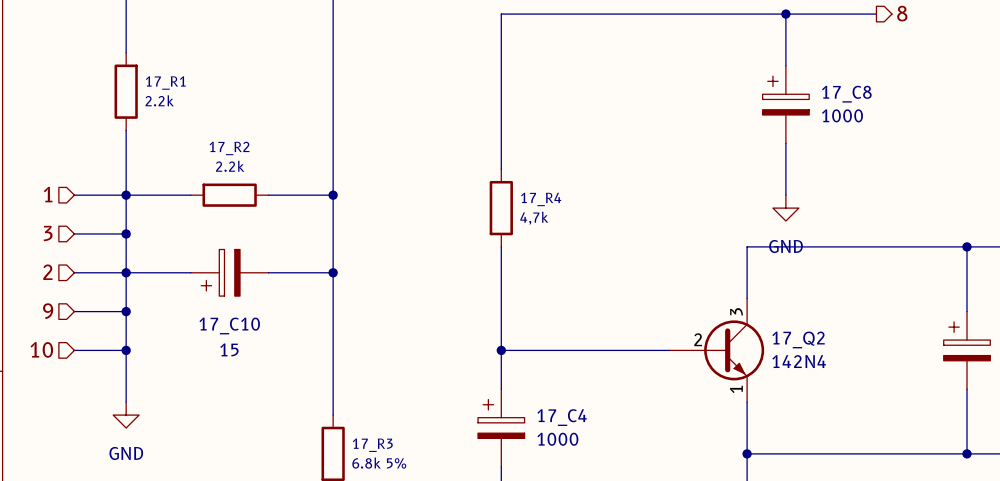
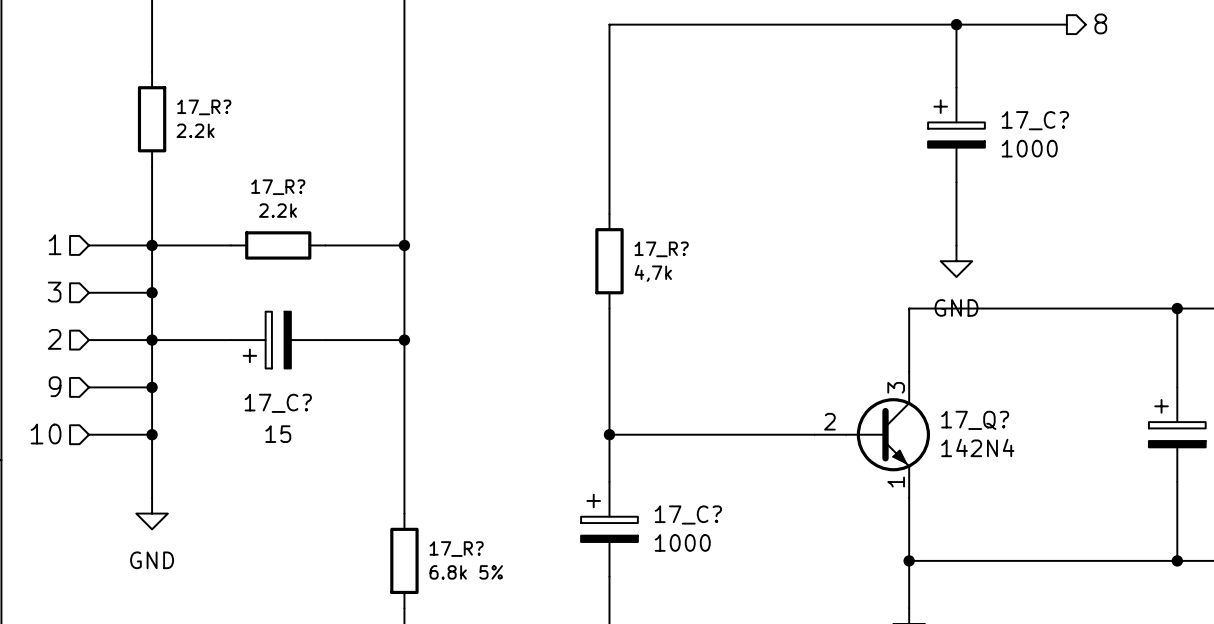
17_R1 name: 17_R1 (165, 83) -> 17_R? (204, 107)
17_C8 name: 17_C8 (846, 94) -> 17_C? (1035, 120)
17_R2 name: 17_R2 (229, 148) -> 17_R? (278, 187)
17_R4 name: 17_R4 (541, 199) -> 17_R? (661, 249)
17_C10 name: 17_C10 (229, 325) -> 17_C? (278, 403)
17_Q2: 142N4 (716, 350) -> none
17_Q?: none -> 142N4 (872, 434)
17_C4 name: 17_C4 (562, 417) -> 17_C? (688, 515)
17_R3 name: 17_R3 (372, 445) -> 17_R? (456, 549)

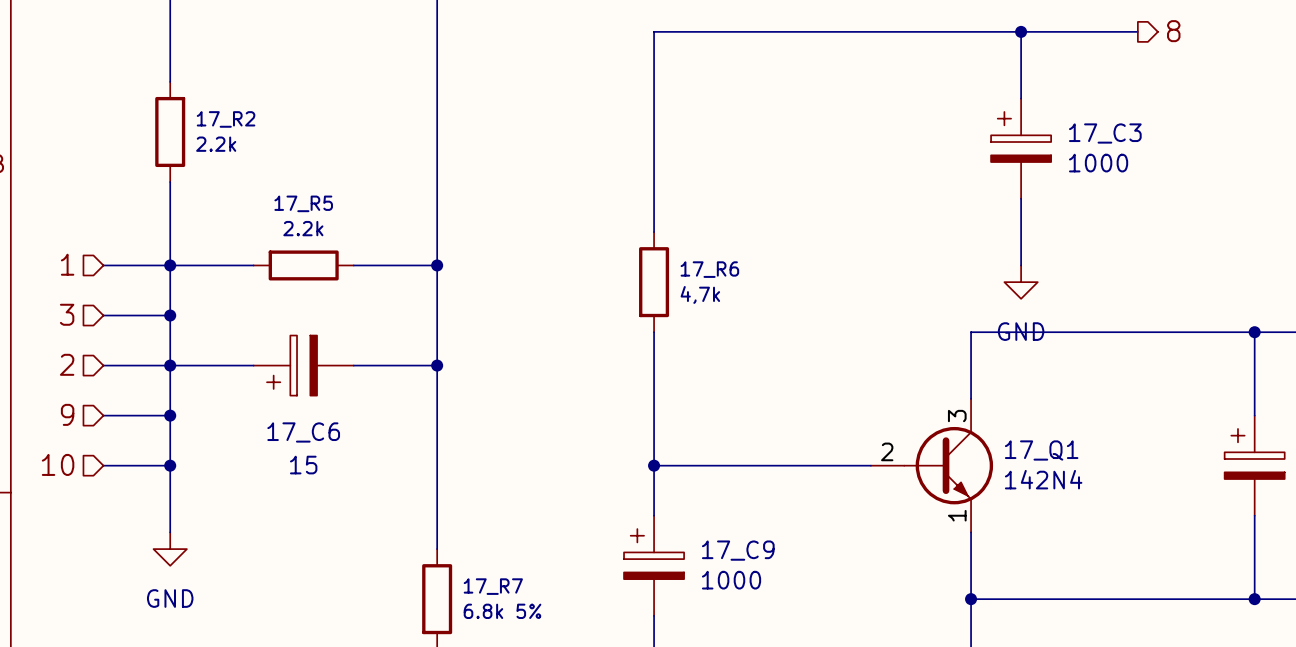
17_R? name: 17_R? (204, 107) -> 17_R2 (226, 119)
17_C? name: 17_C? (1035, 120) -> 17_C3 (1105, 133)
17_R? name: 17_R? (278, 187) -> 17_R5 (303, 203)
17_R? name: 17_R? (661, 249) -> 17_R6 (709, 269)
17_C? name: 17_C? (278, 403) -> 17_C6 (303, 432)
17_Q? name: 17_Q? (975, 420) -> 17_Q1 (1041, 450)
17_C? name: 17_C? (688, 515) -> 17_C9 (738, 550)
17_R? name: 17_R? (456, 549) -> 17_R7 (493, 586)

